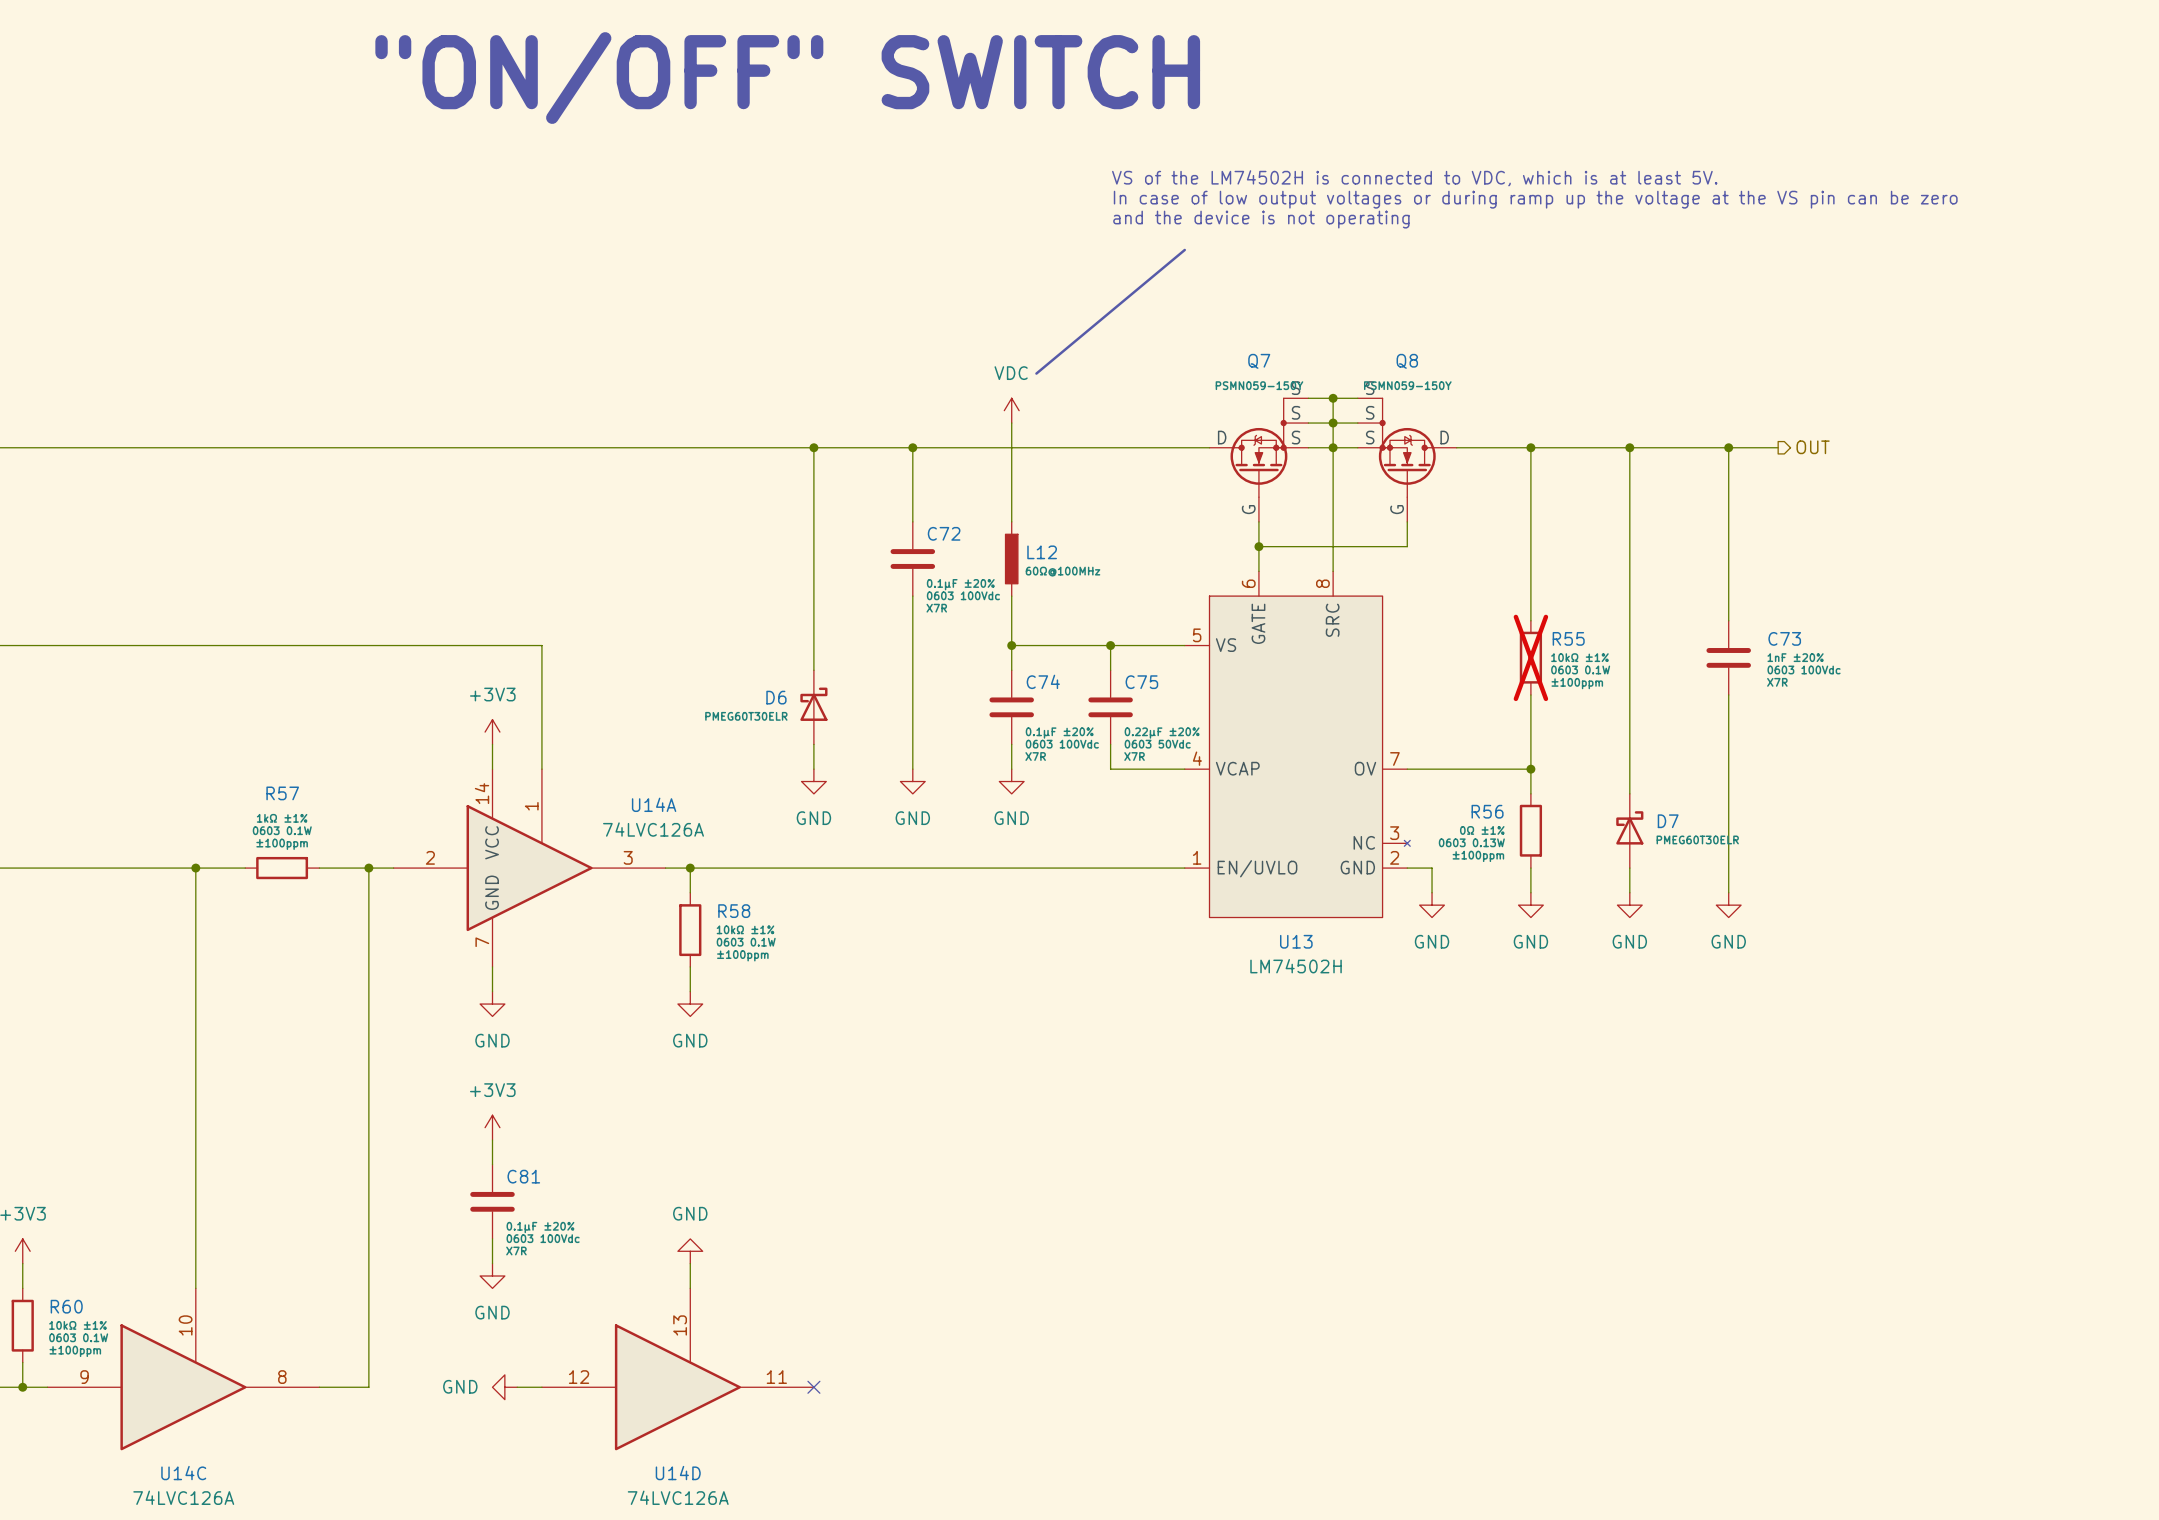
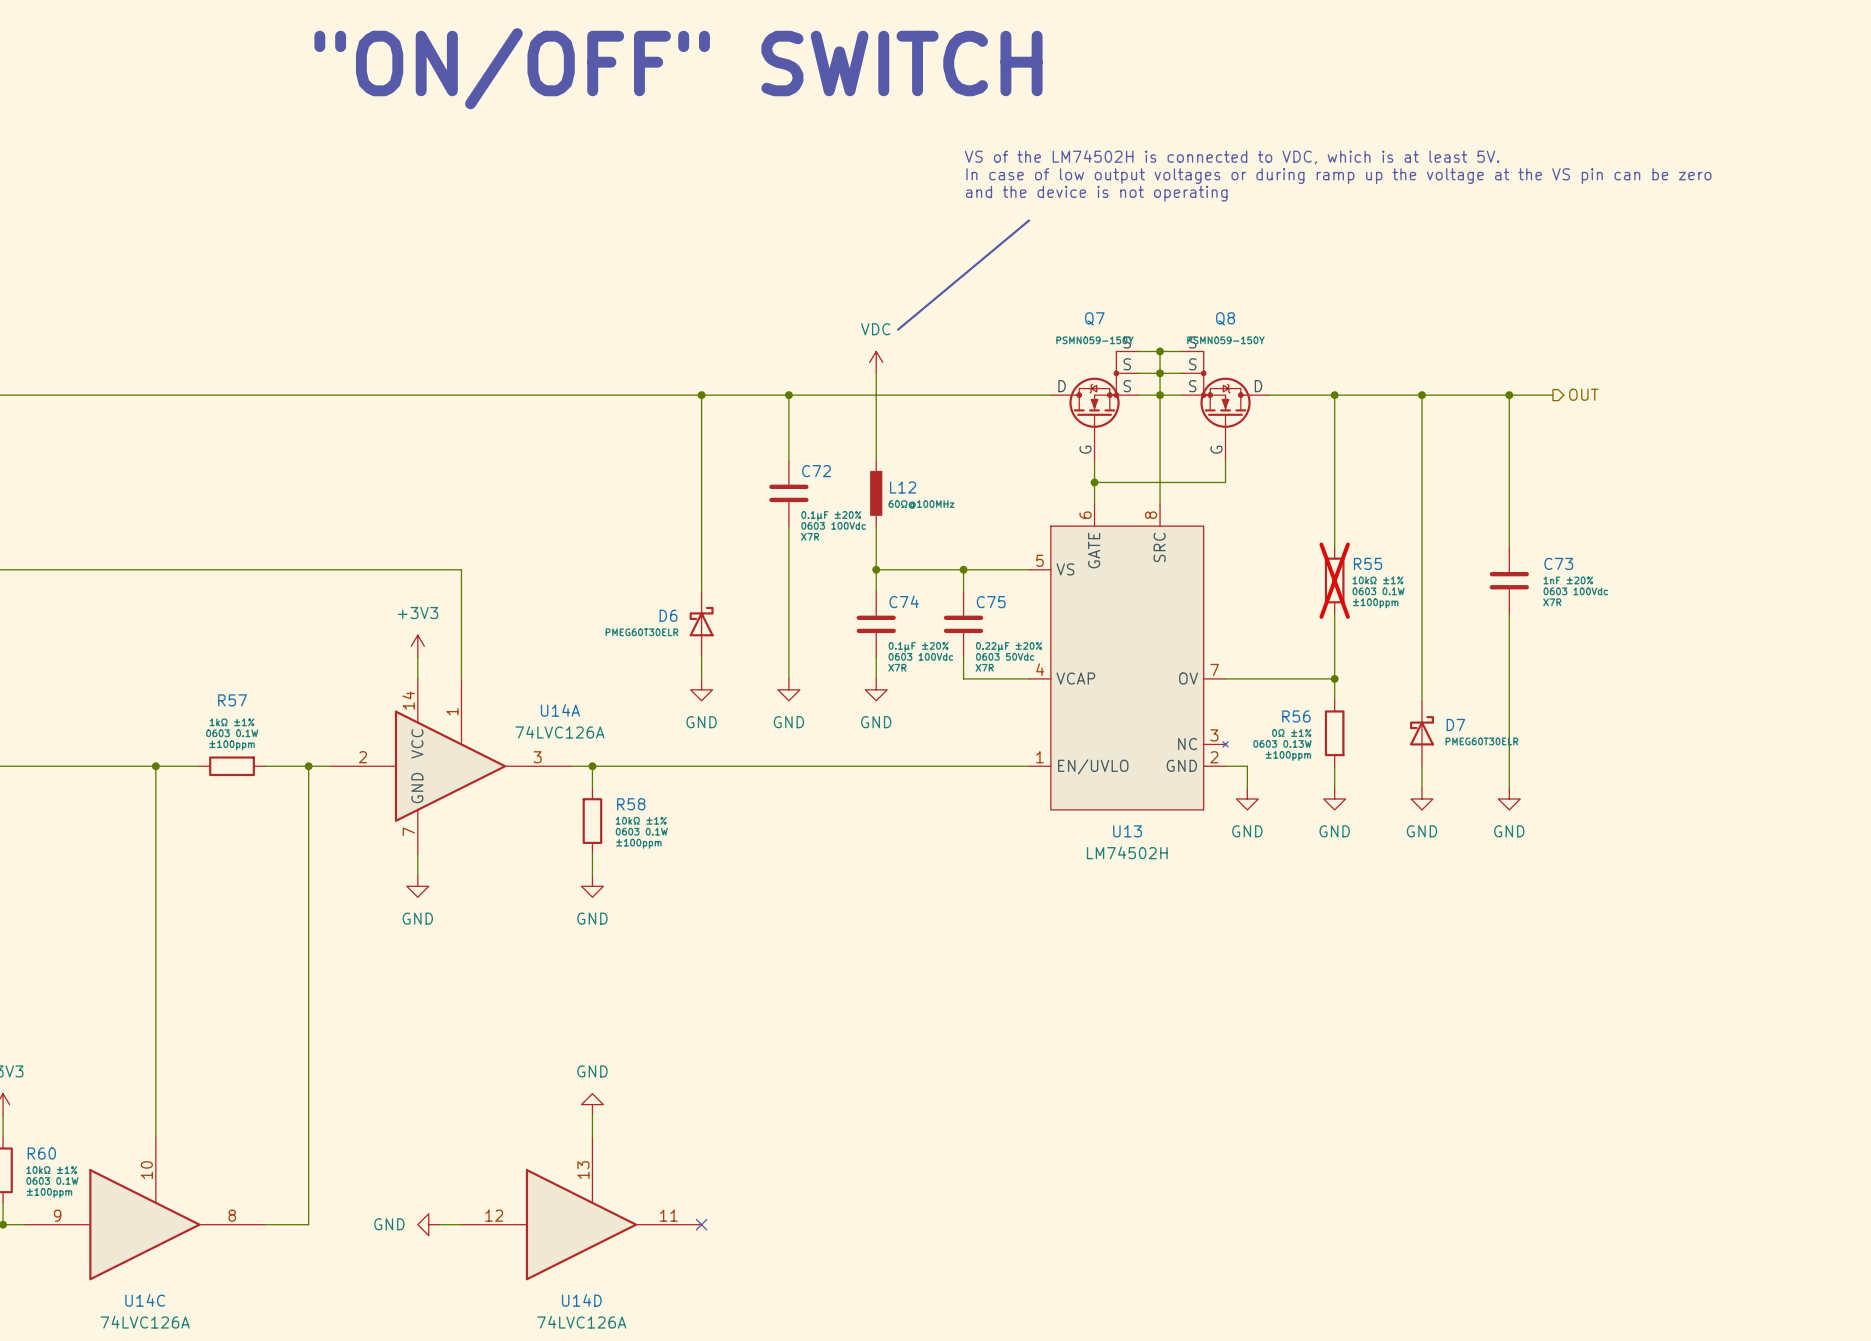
power symbol: +3V3 (492, 1127) -> none
wire: (492, 1140) (492, 1164) -> none
C81: (492, 1201) -> none
wire: (492, 1238) (492, 1263) -> none
power symbol: GND (492, 1276) -> none

